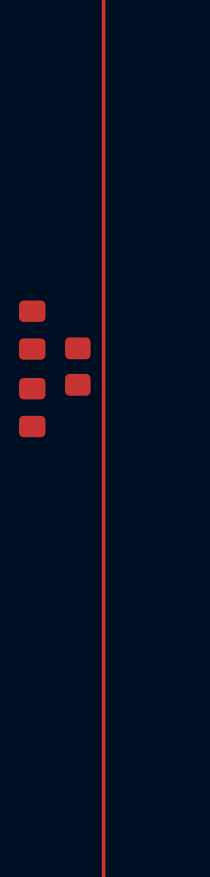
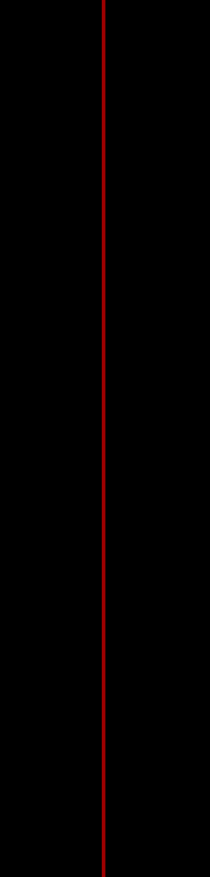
part: (32, 330) -> none
part: (77, 366) -> none
part: (32, 407) -> none

